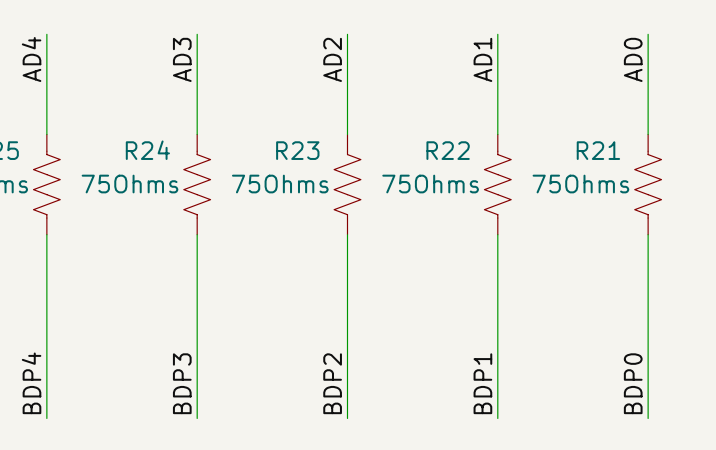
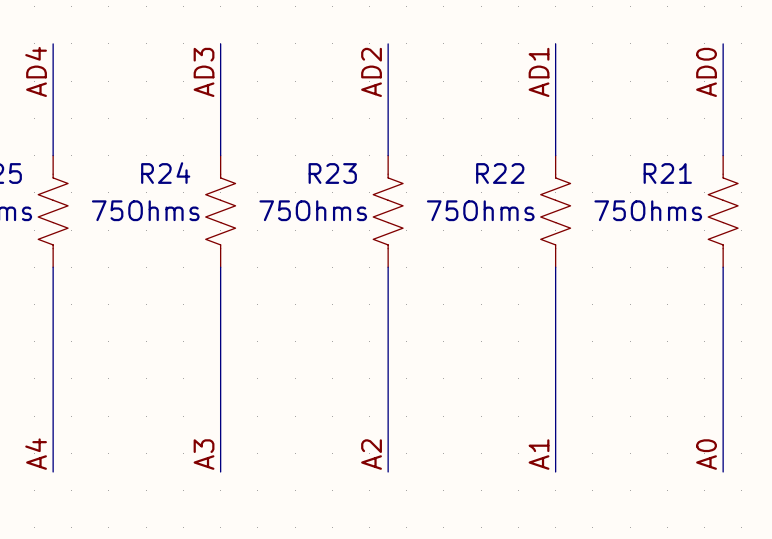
label: BDP4 (31, 383) -> A4 (36, 454)
label: BDP3 (182, 383) -> A3 (204, 454)
label: BDP2 (332, 383) -> A2 (371, 454)
label: BDP1 (482, 383) -> A1 (539, 454)
label: BDP0 (633, 383) -> A0 (706, 454)

